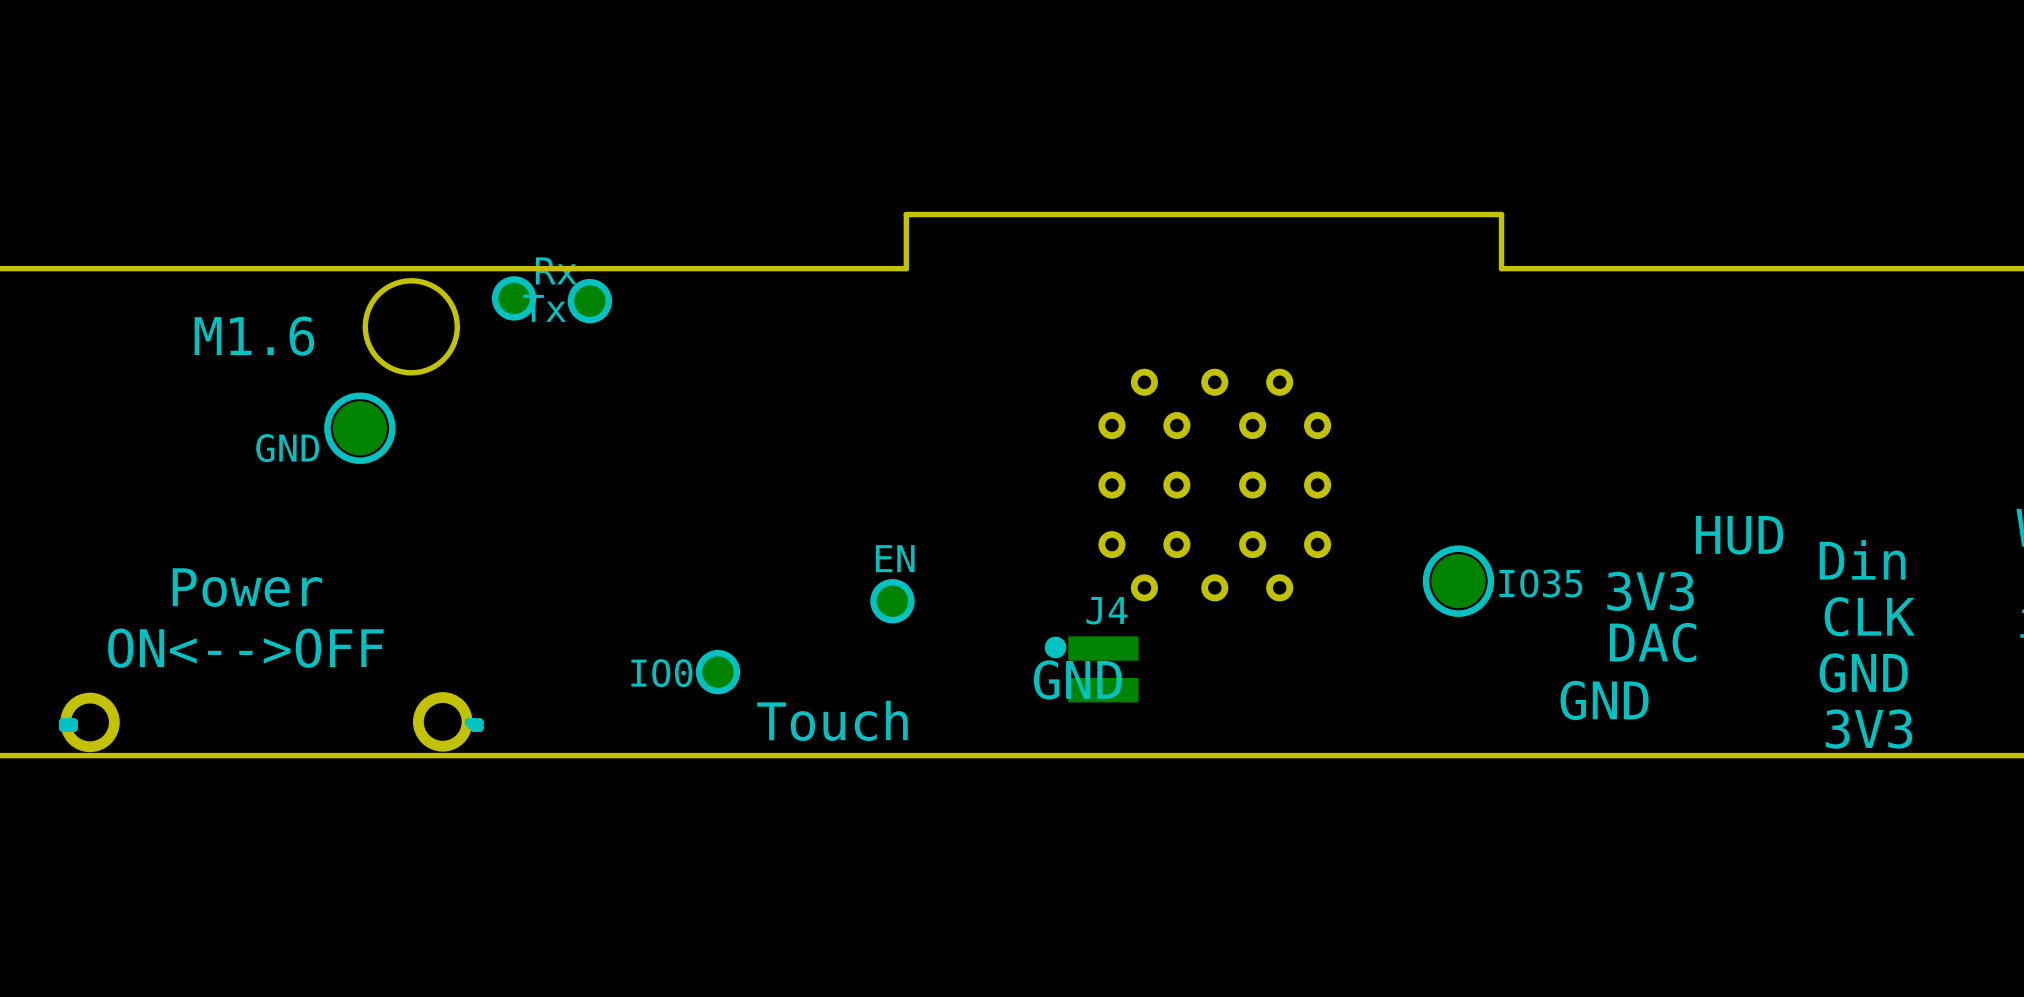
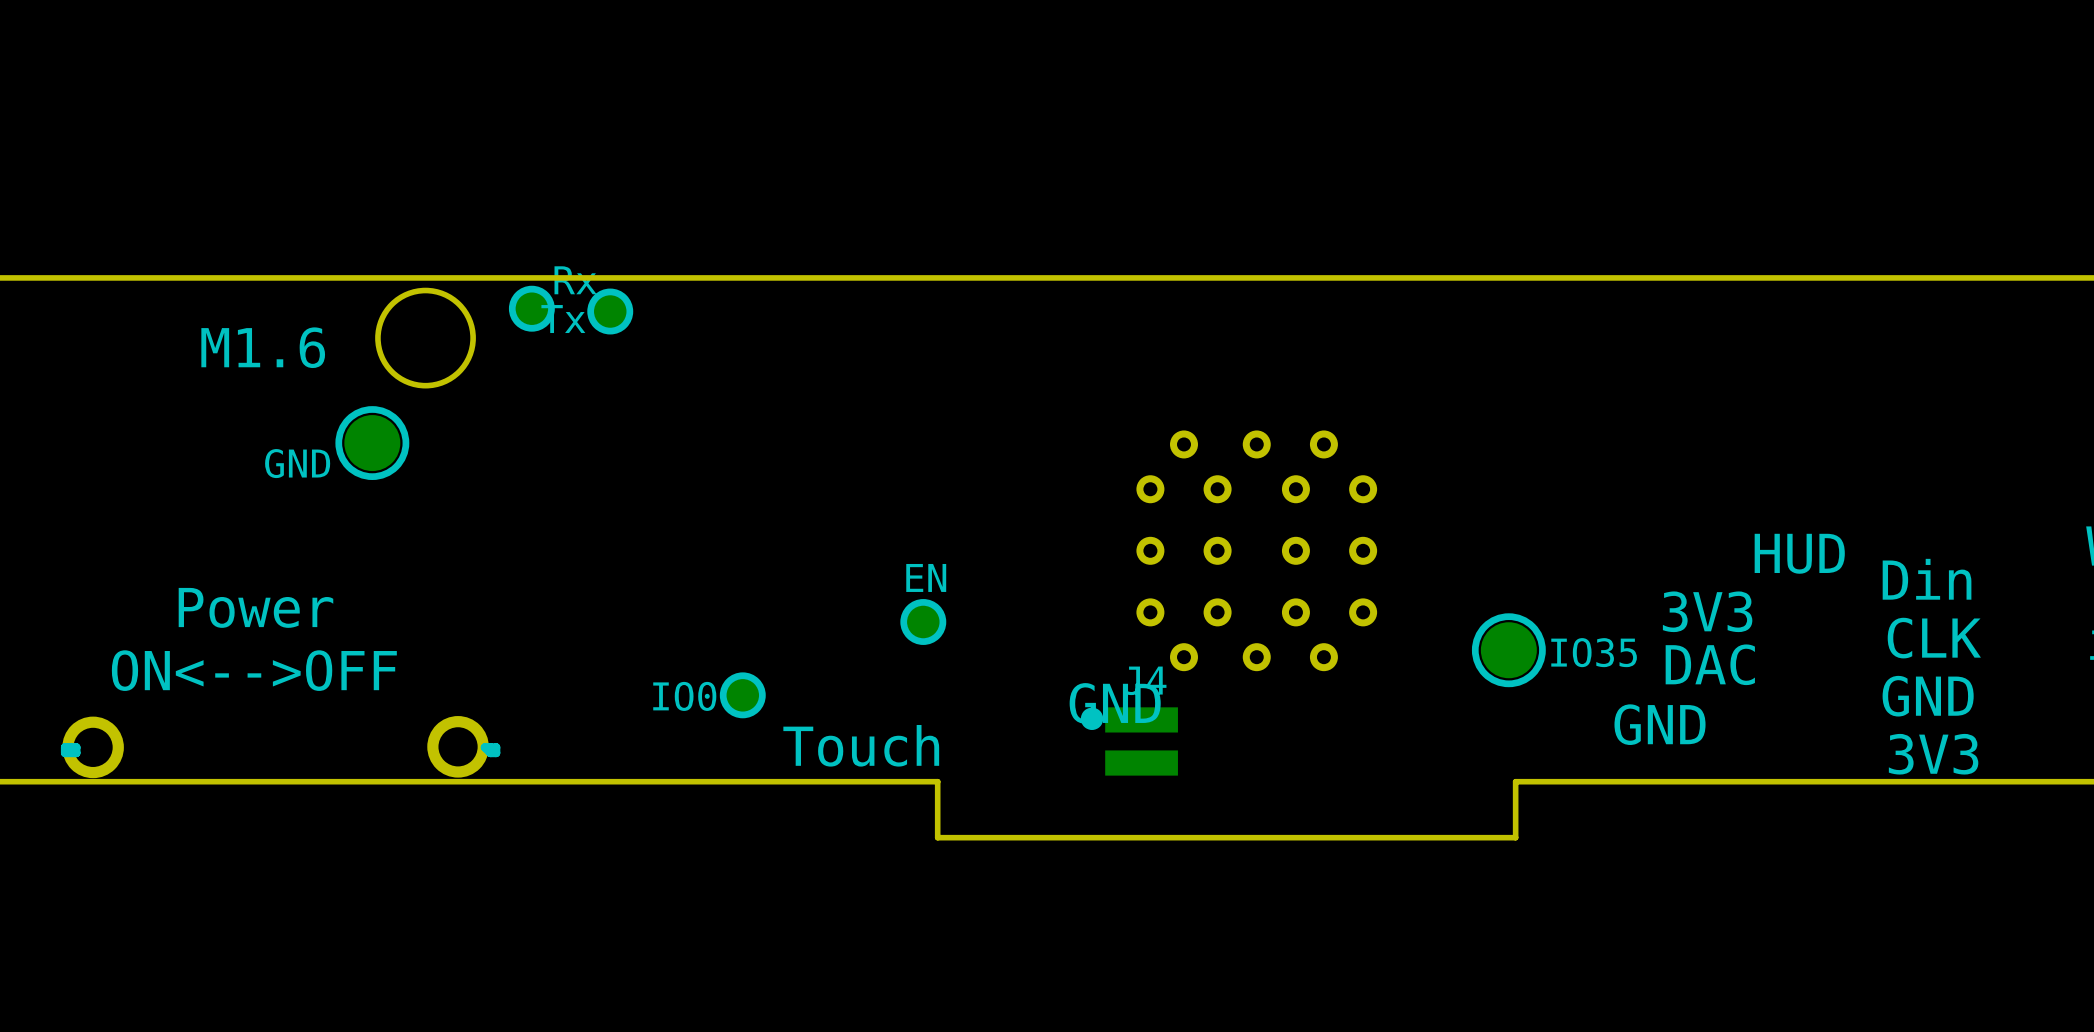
board edge: (1501, 268) (1501, 214) (906, 214) (906, 268) -> (1553, 277) (937, 277)
part position: (1214, 485) -> (1256, 550)
part position: (1458, 581) -> (1508, 650)
J4 position: (1091, 669) -> (1129, 741)
board edge: (1464, 755) (906, 755) -> (1515, 781) (1515, 837) (937, 837) (937, 781)

